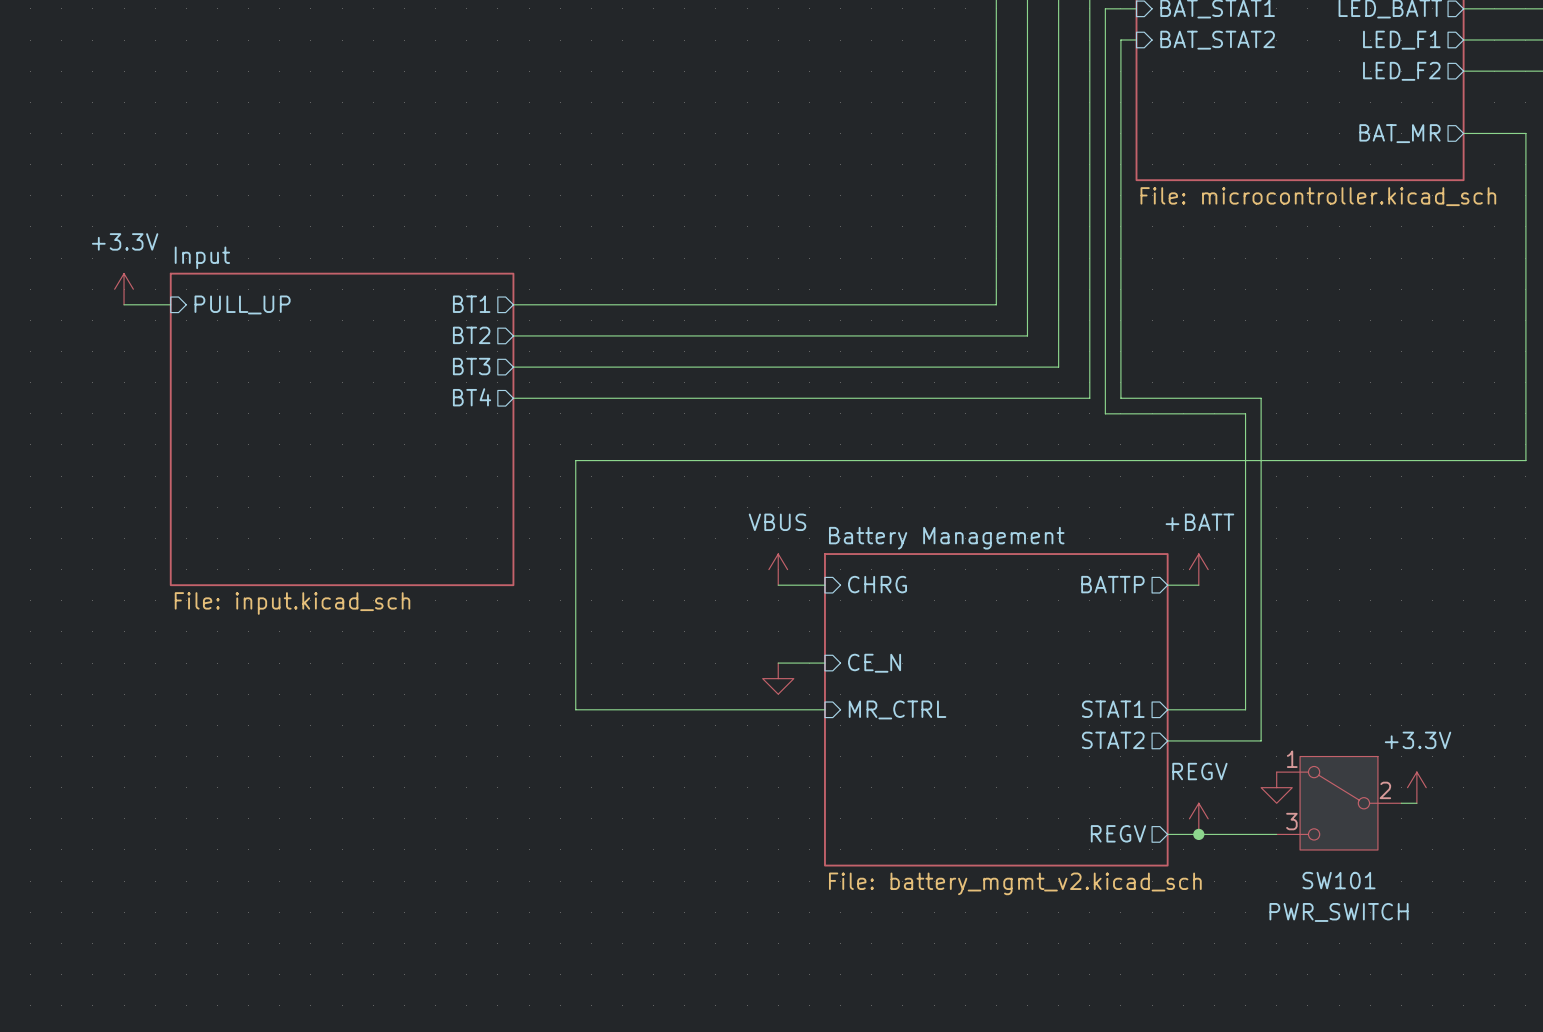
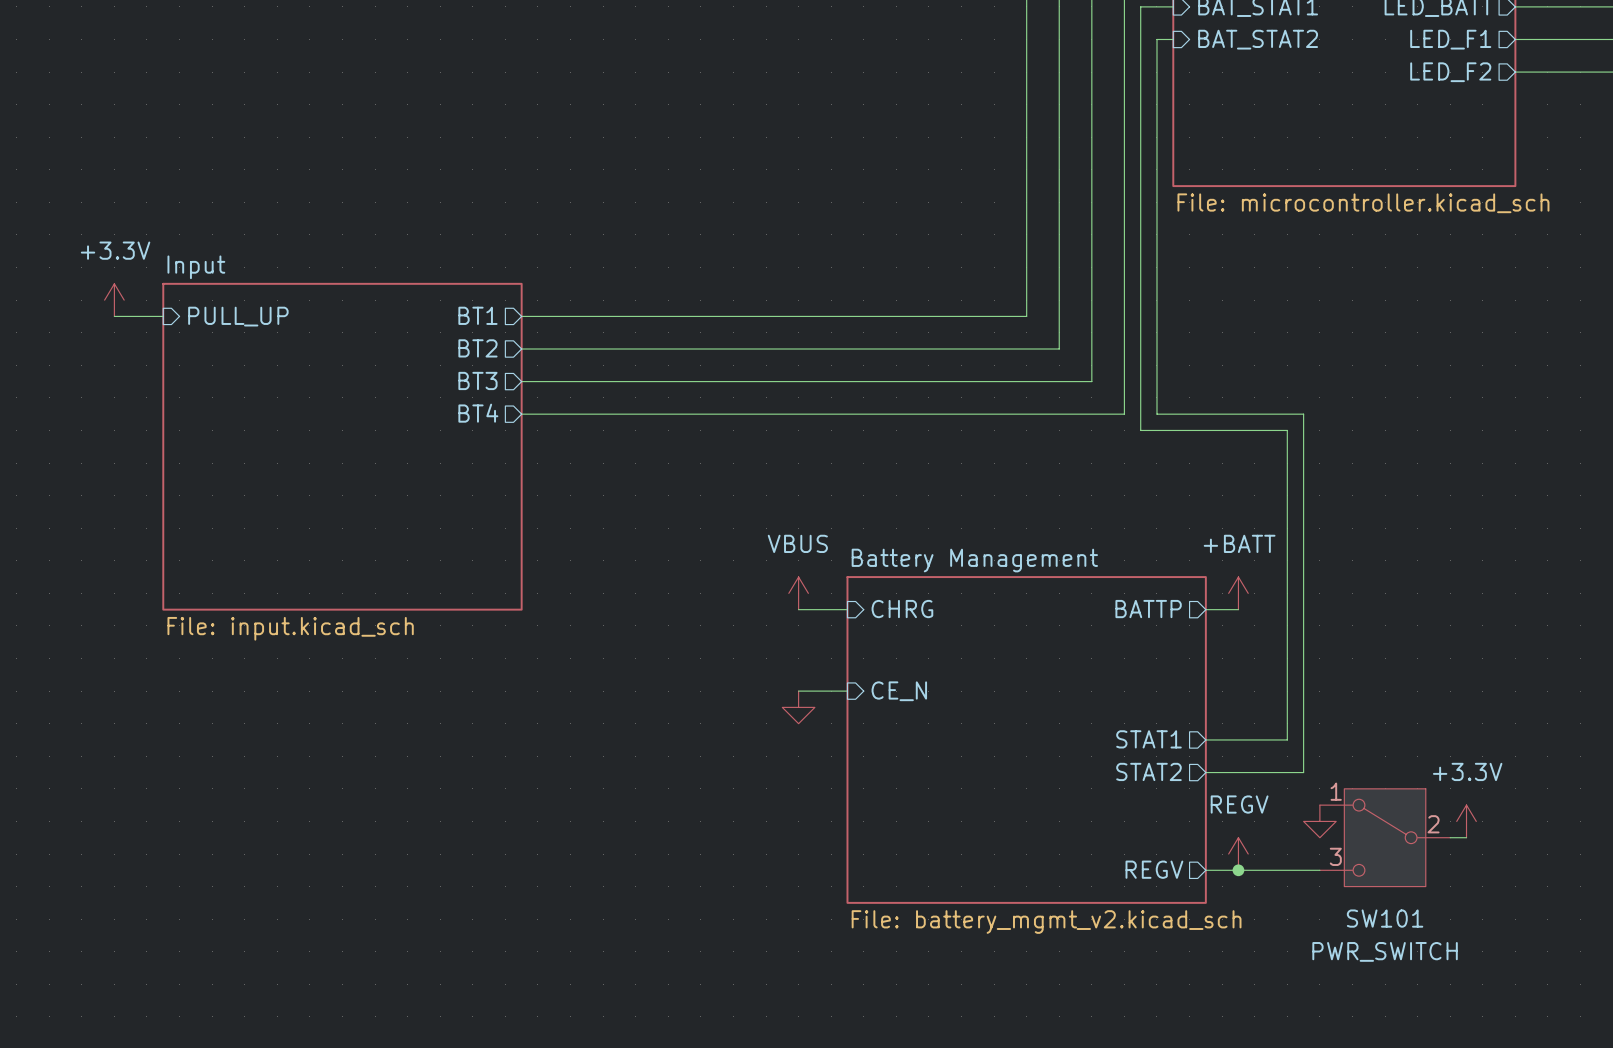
sheet pin: BAT_MR (1399, 133) -> none
wire: (1463, 133) (1525, 133) (1525, 460) (575, 460) (575, 709) (824, 709) -> none
sheet pin: MR_CTRL (897, 709) -> none

